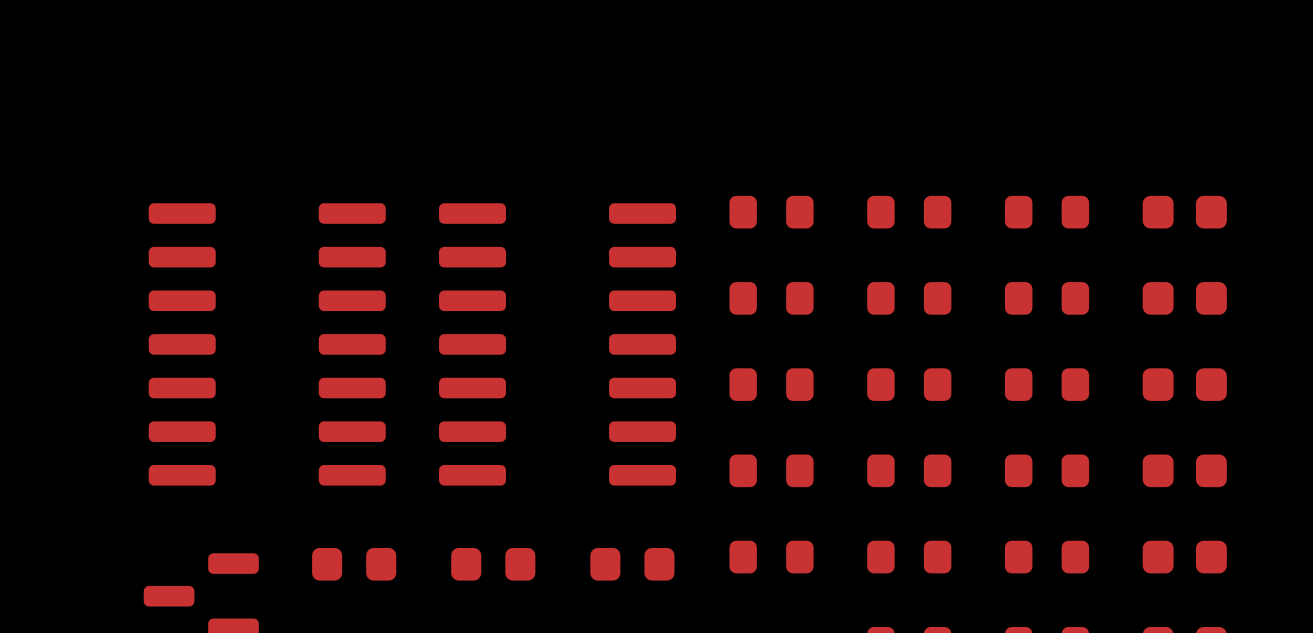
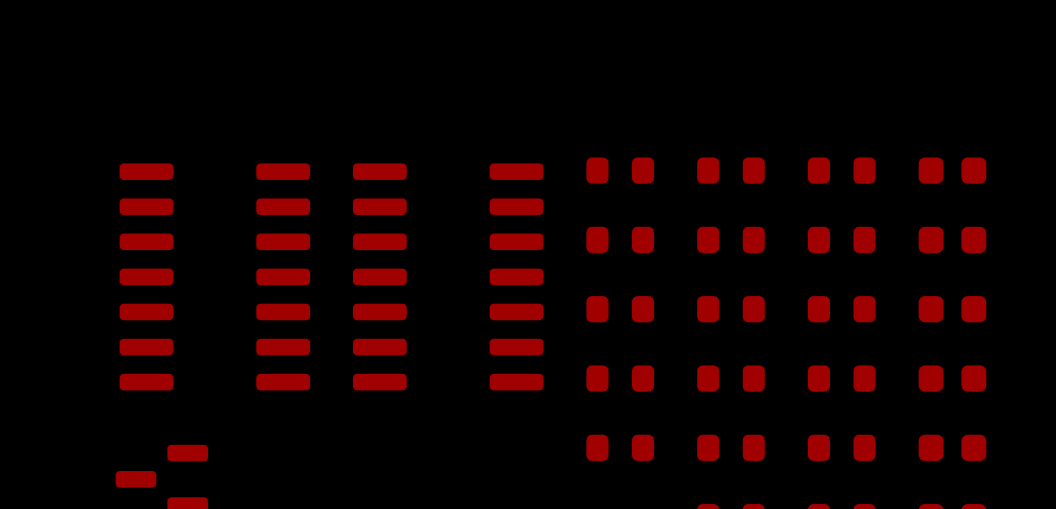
part: (354, 564) -> none
part: (493, 564) -> none
part: (632, 564) -> none

